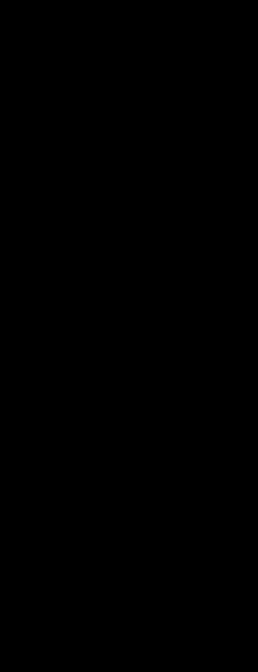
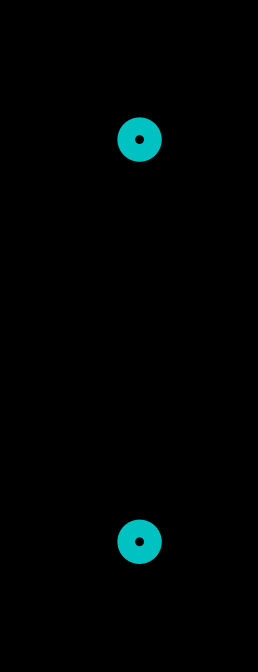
part: none -> (139, 139)
part: none -> (139, 541)

